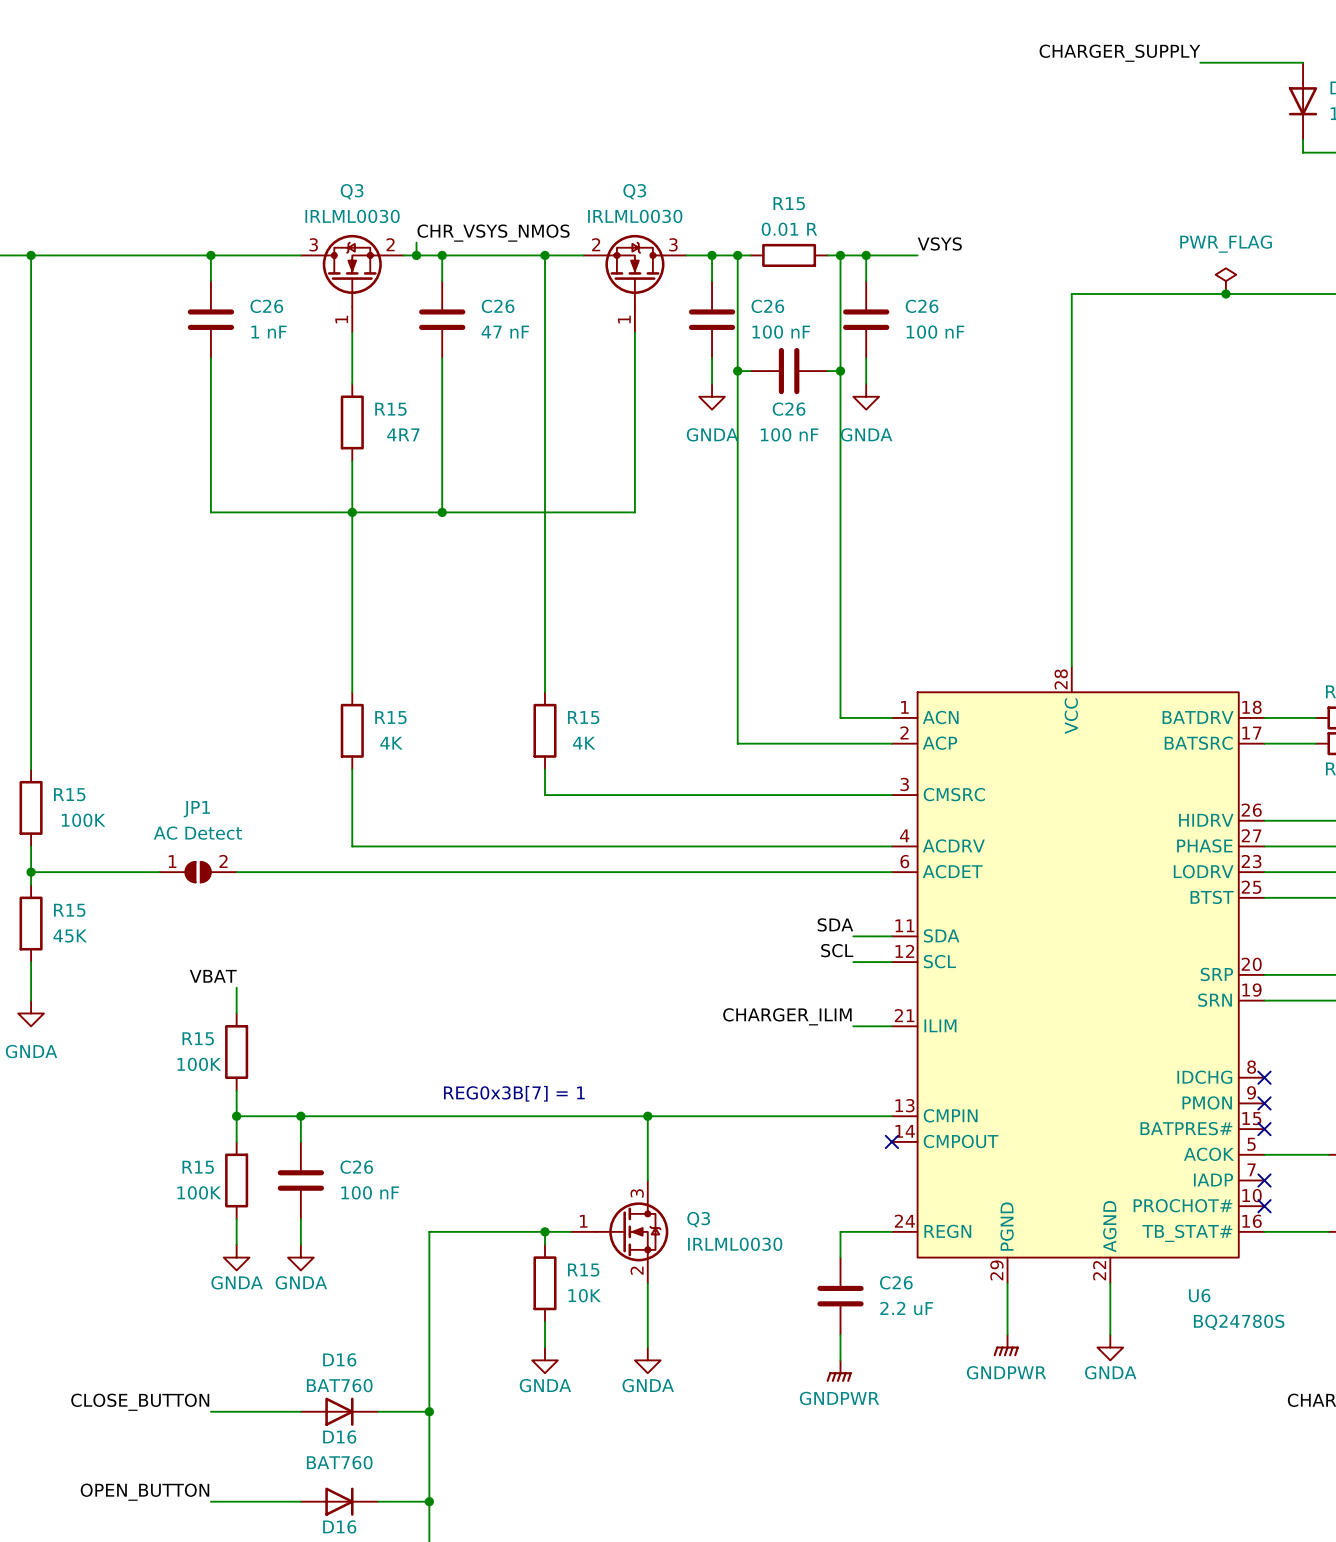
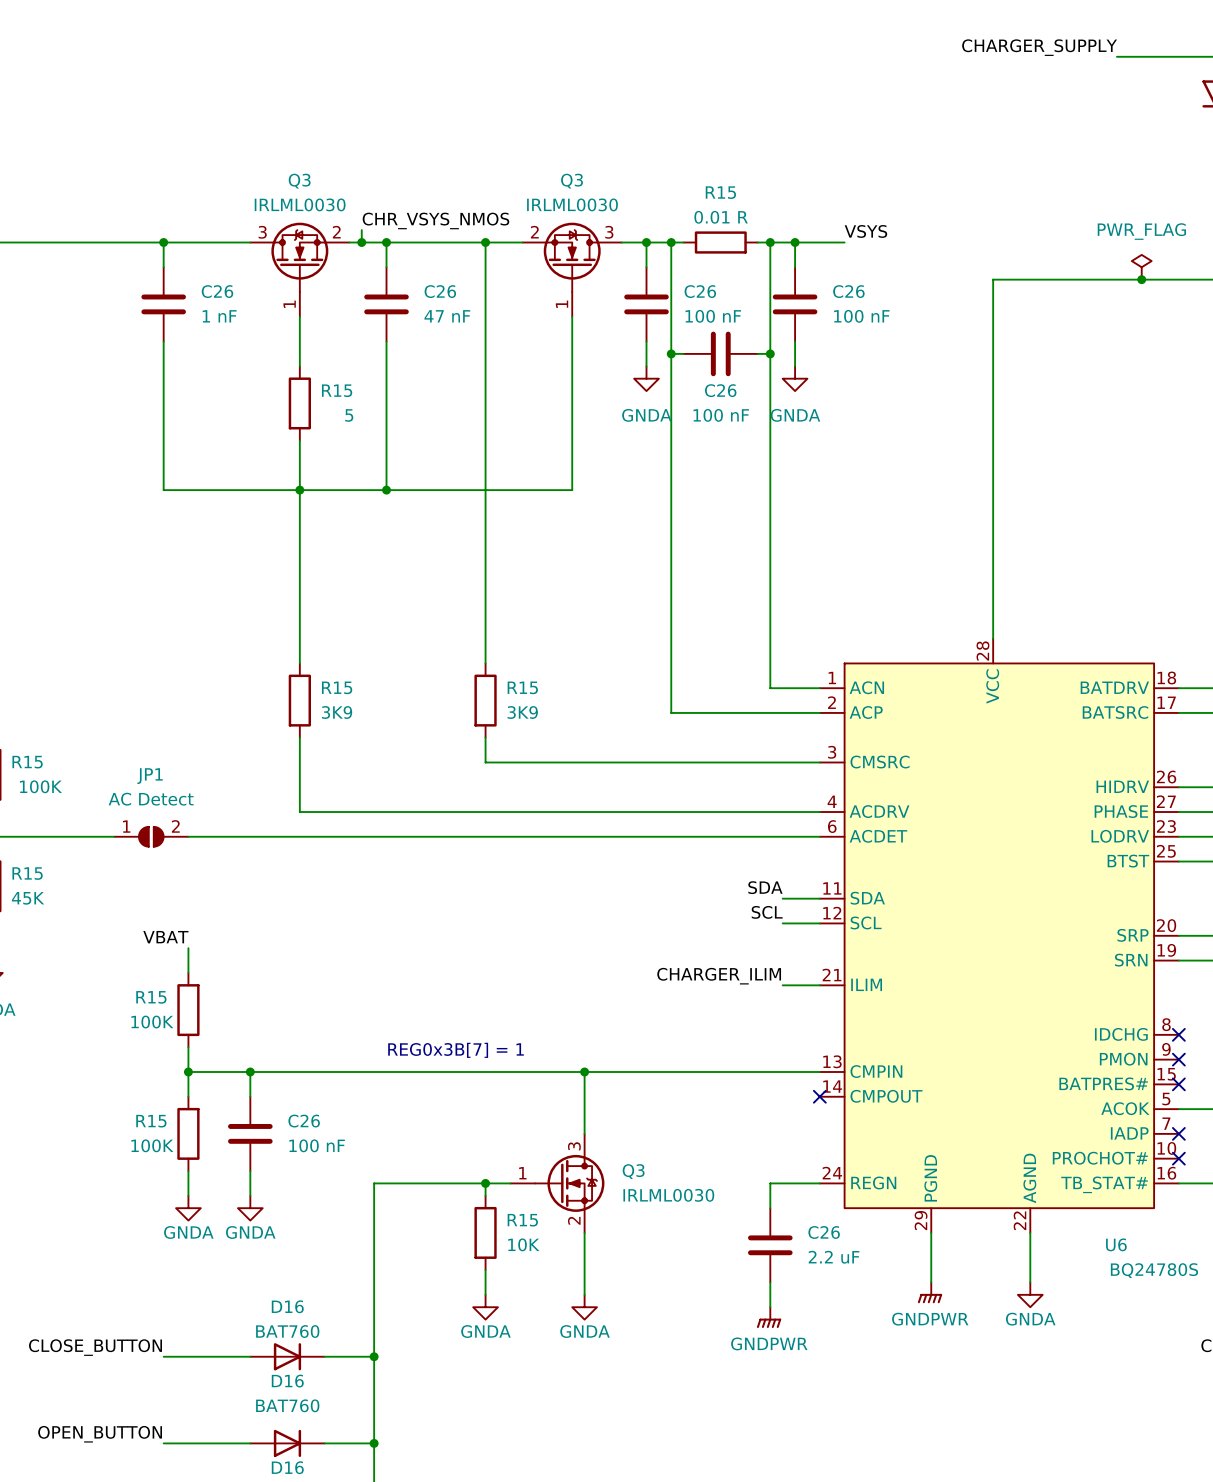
R15 value: 4R7 (403, 434) -> 5 (349, 415)
R15 value: 4K (391, 743) -> 3K9 (337, 712)
R15 value: 4K (584, 743) -> 3K9 (522, 712)

